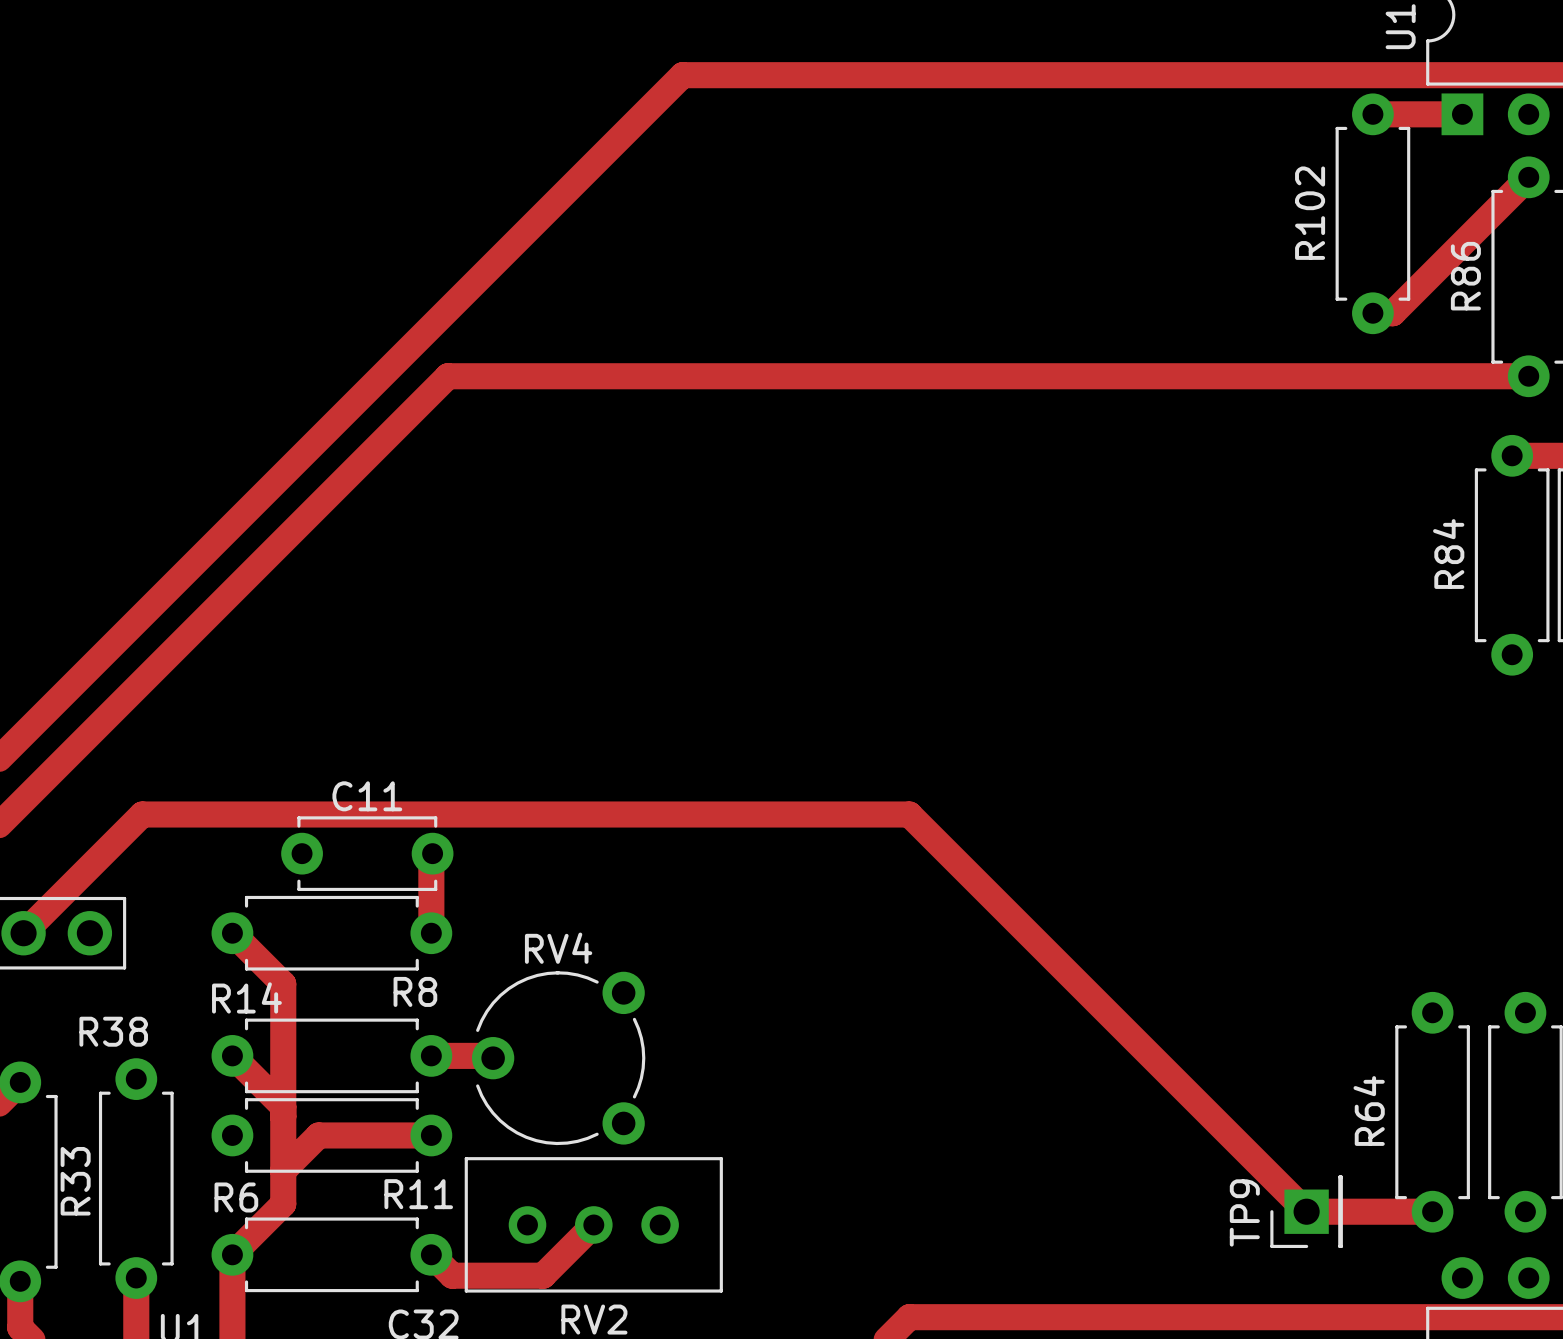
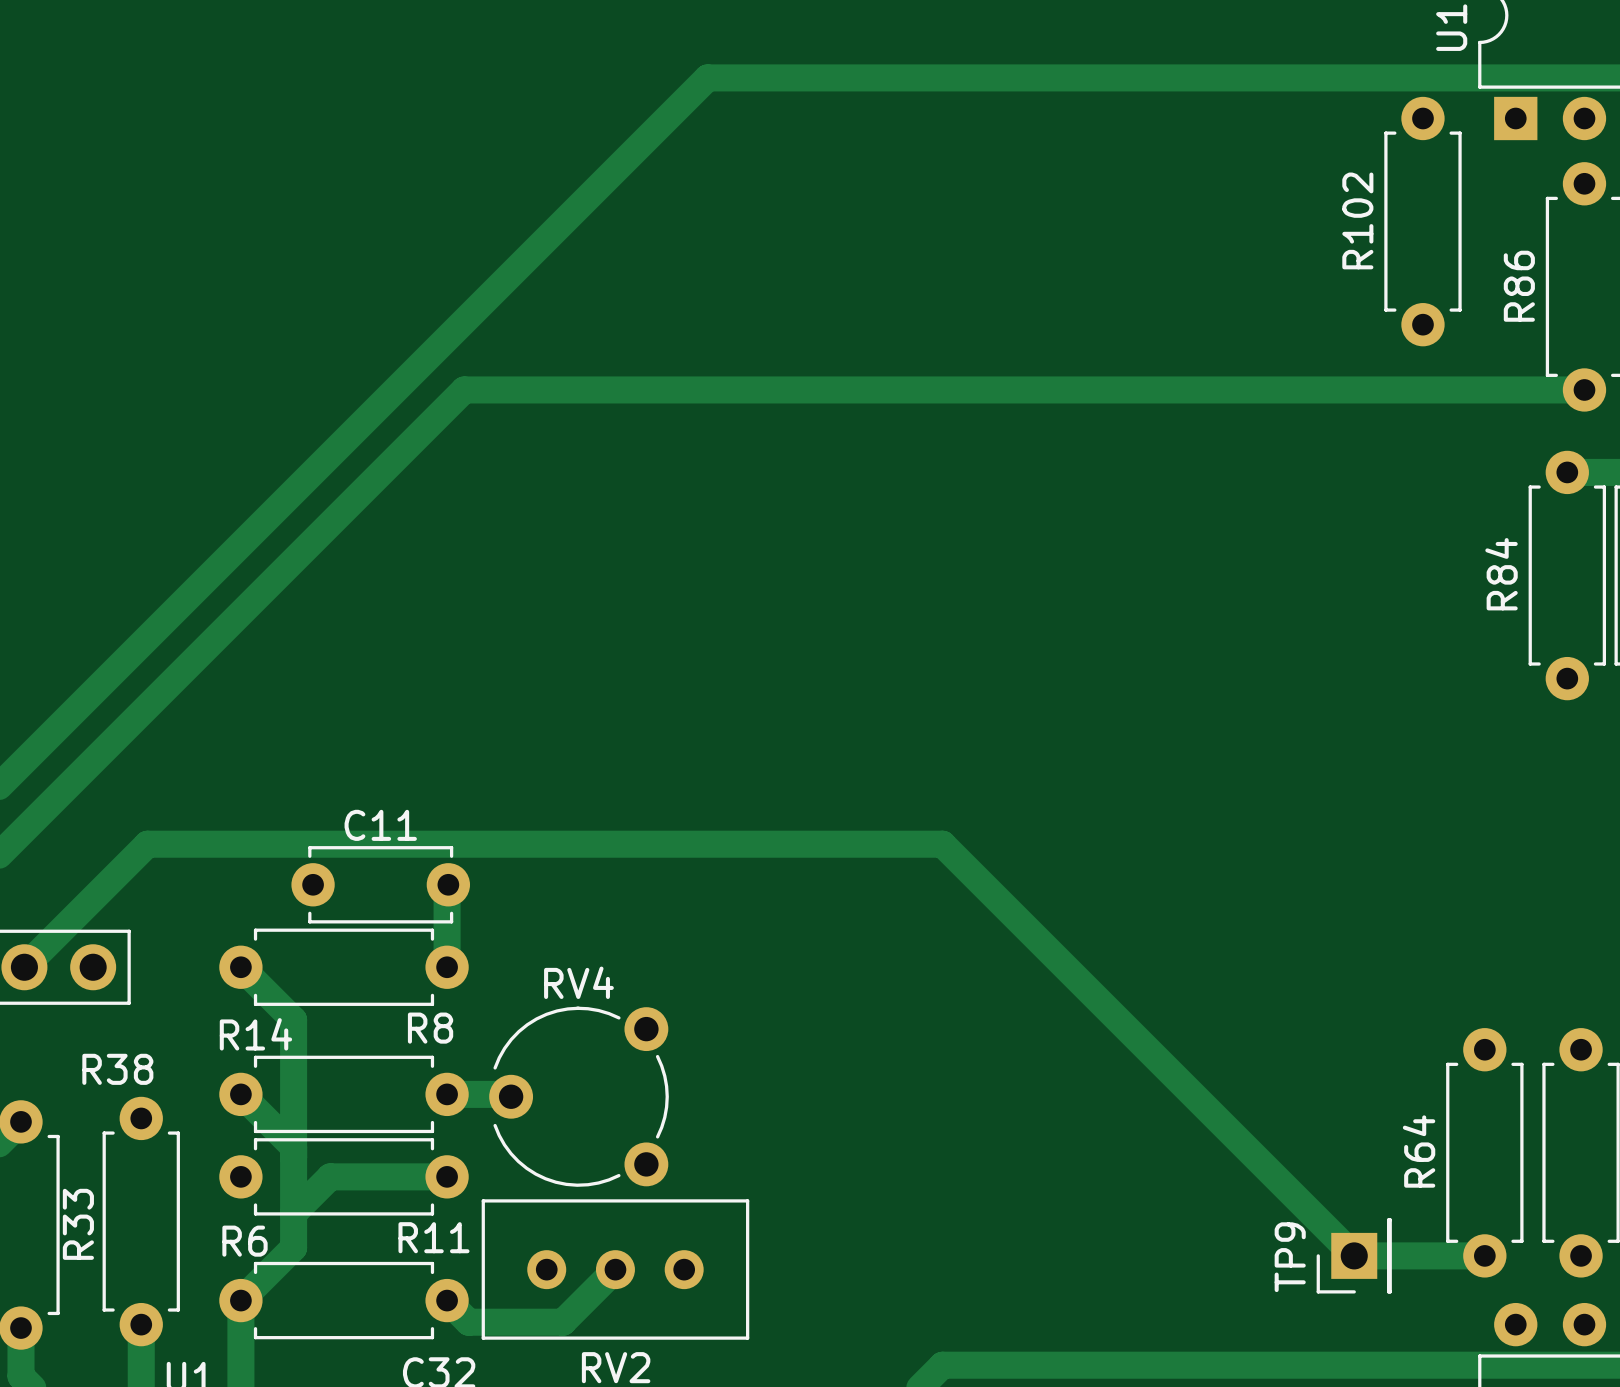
track: (1372, 114) (1462, 114) -> none
track: (1528, 177) (1392, 313) (1372, 313) -> none

